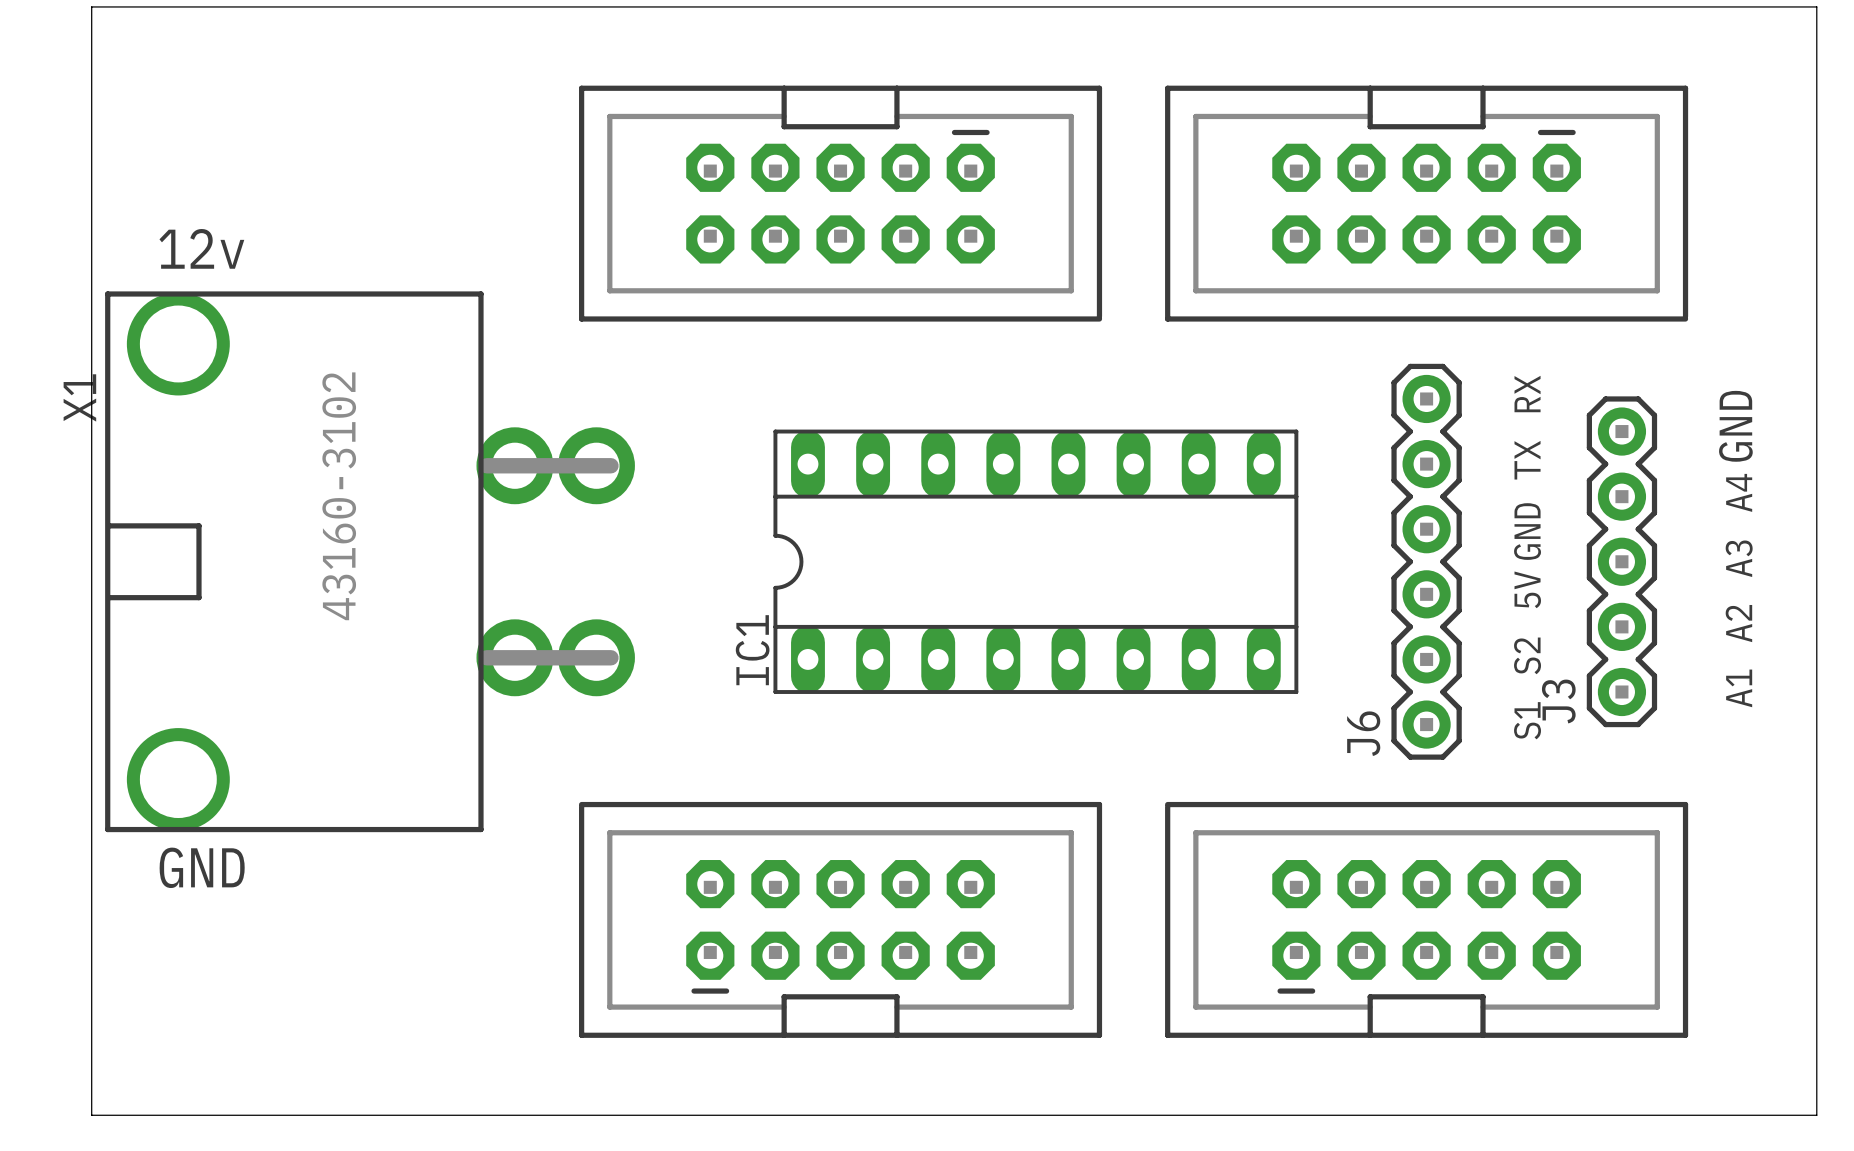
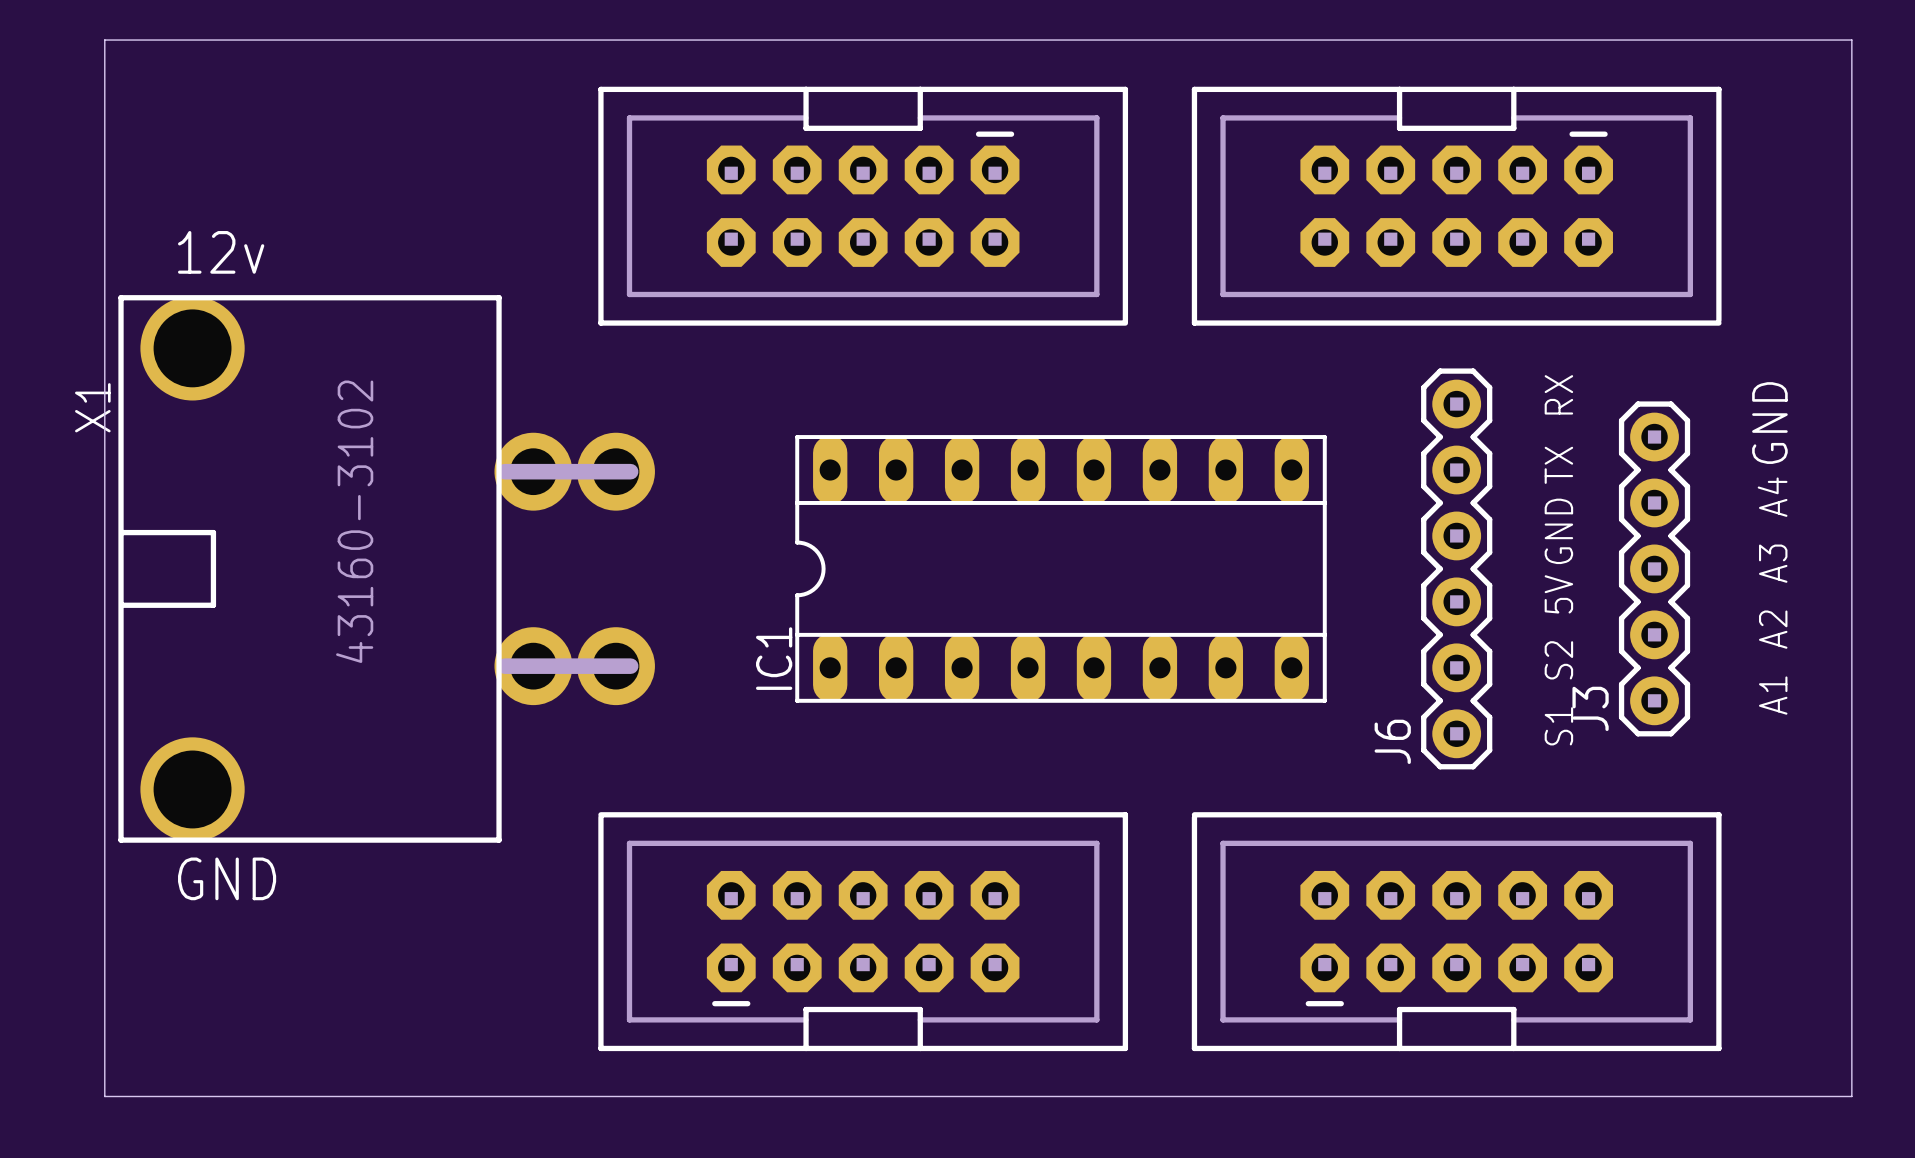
board edge: (91, 39) (91, 6) (1816, 6) (1816, 39) -> (104, 40) (1851, 40)
board edge: (91, 1082) (91, 1115) (1816, 1115) (1816, 1082) -> (104, 1096) (1851, 1096)

